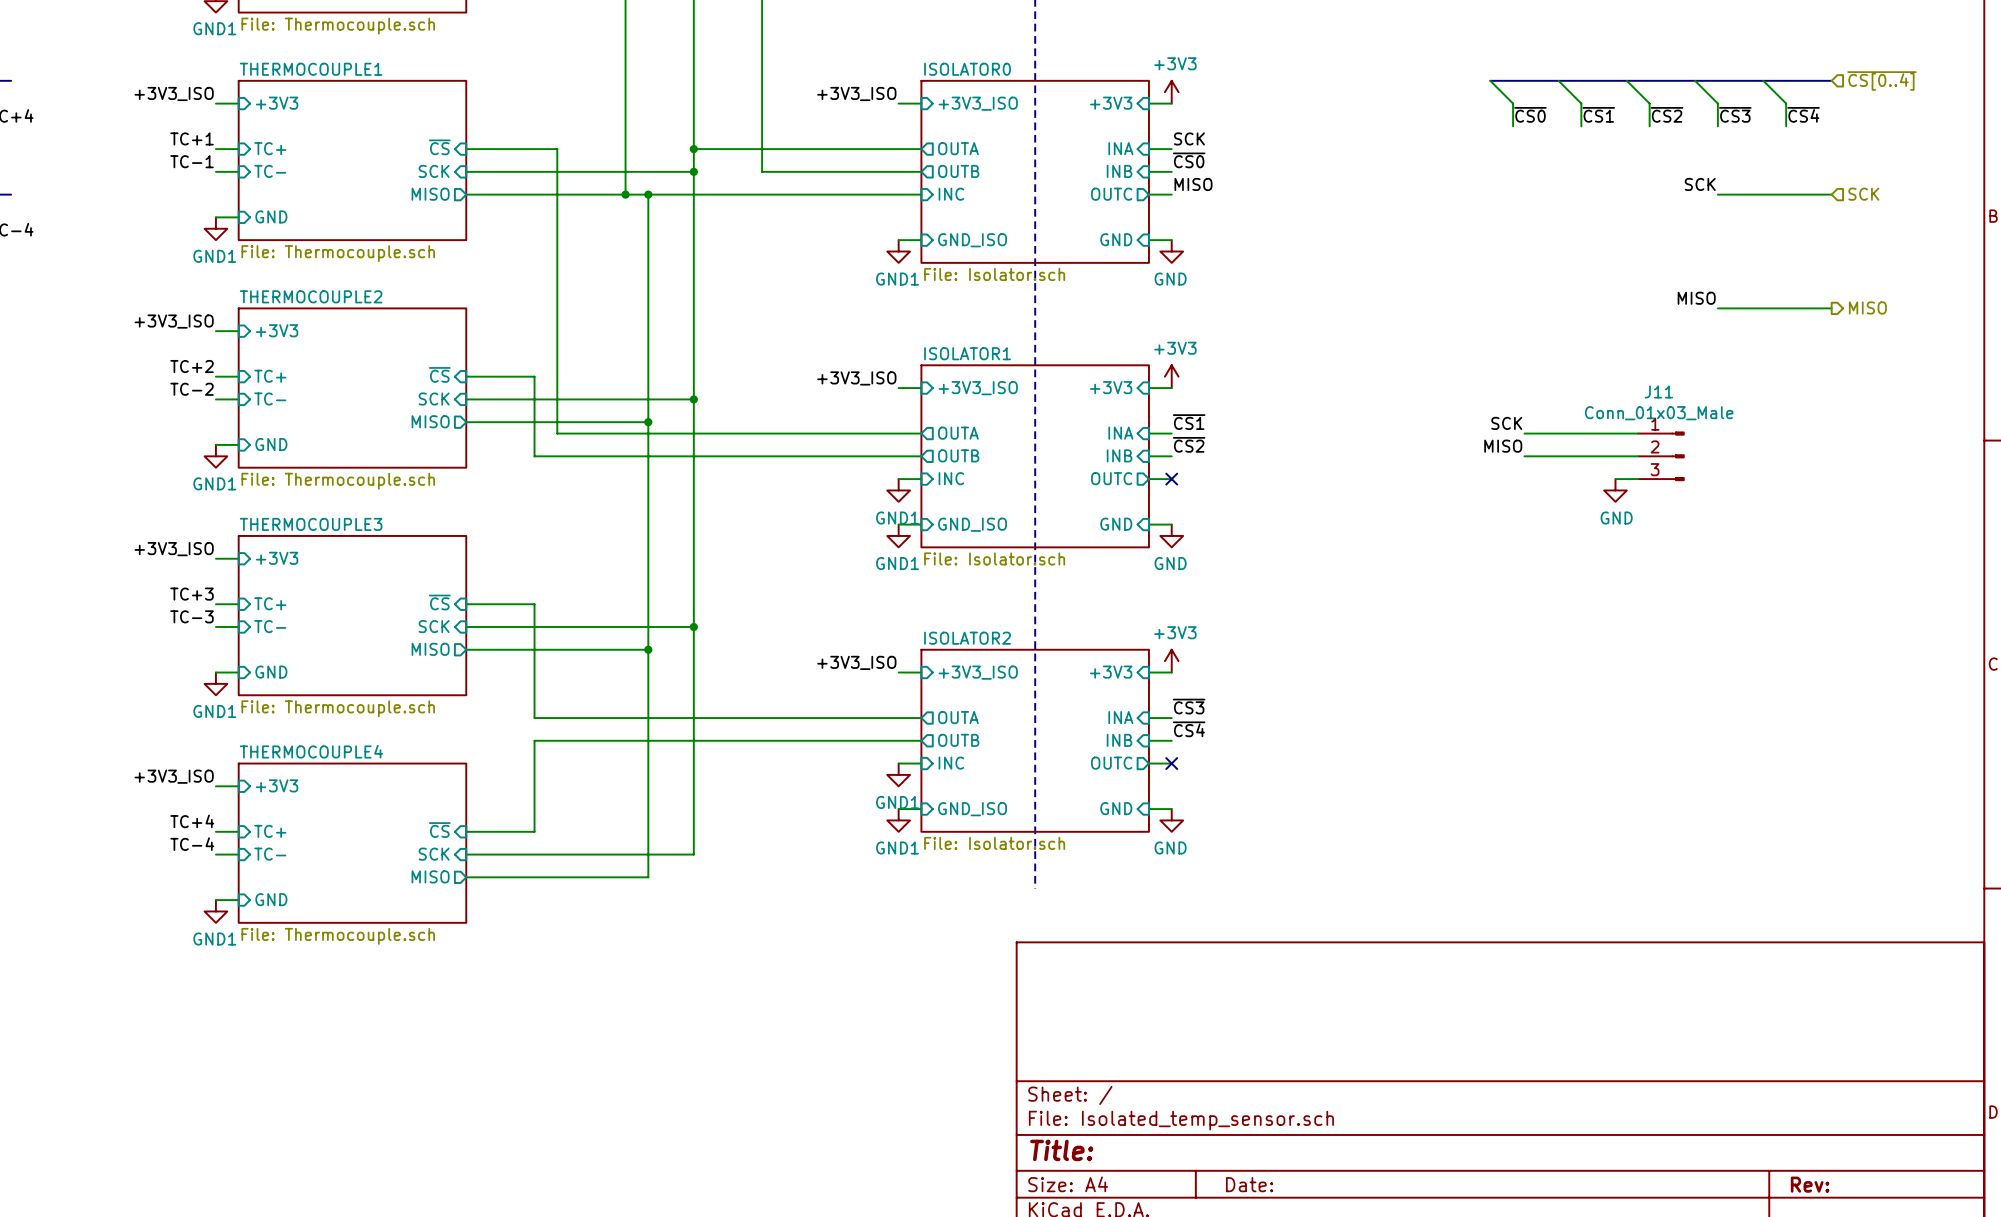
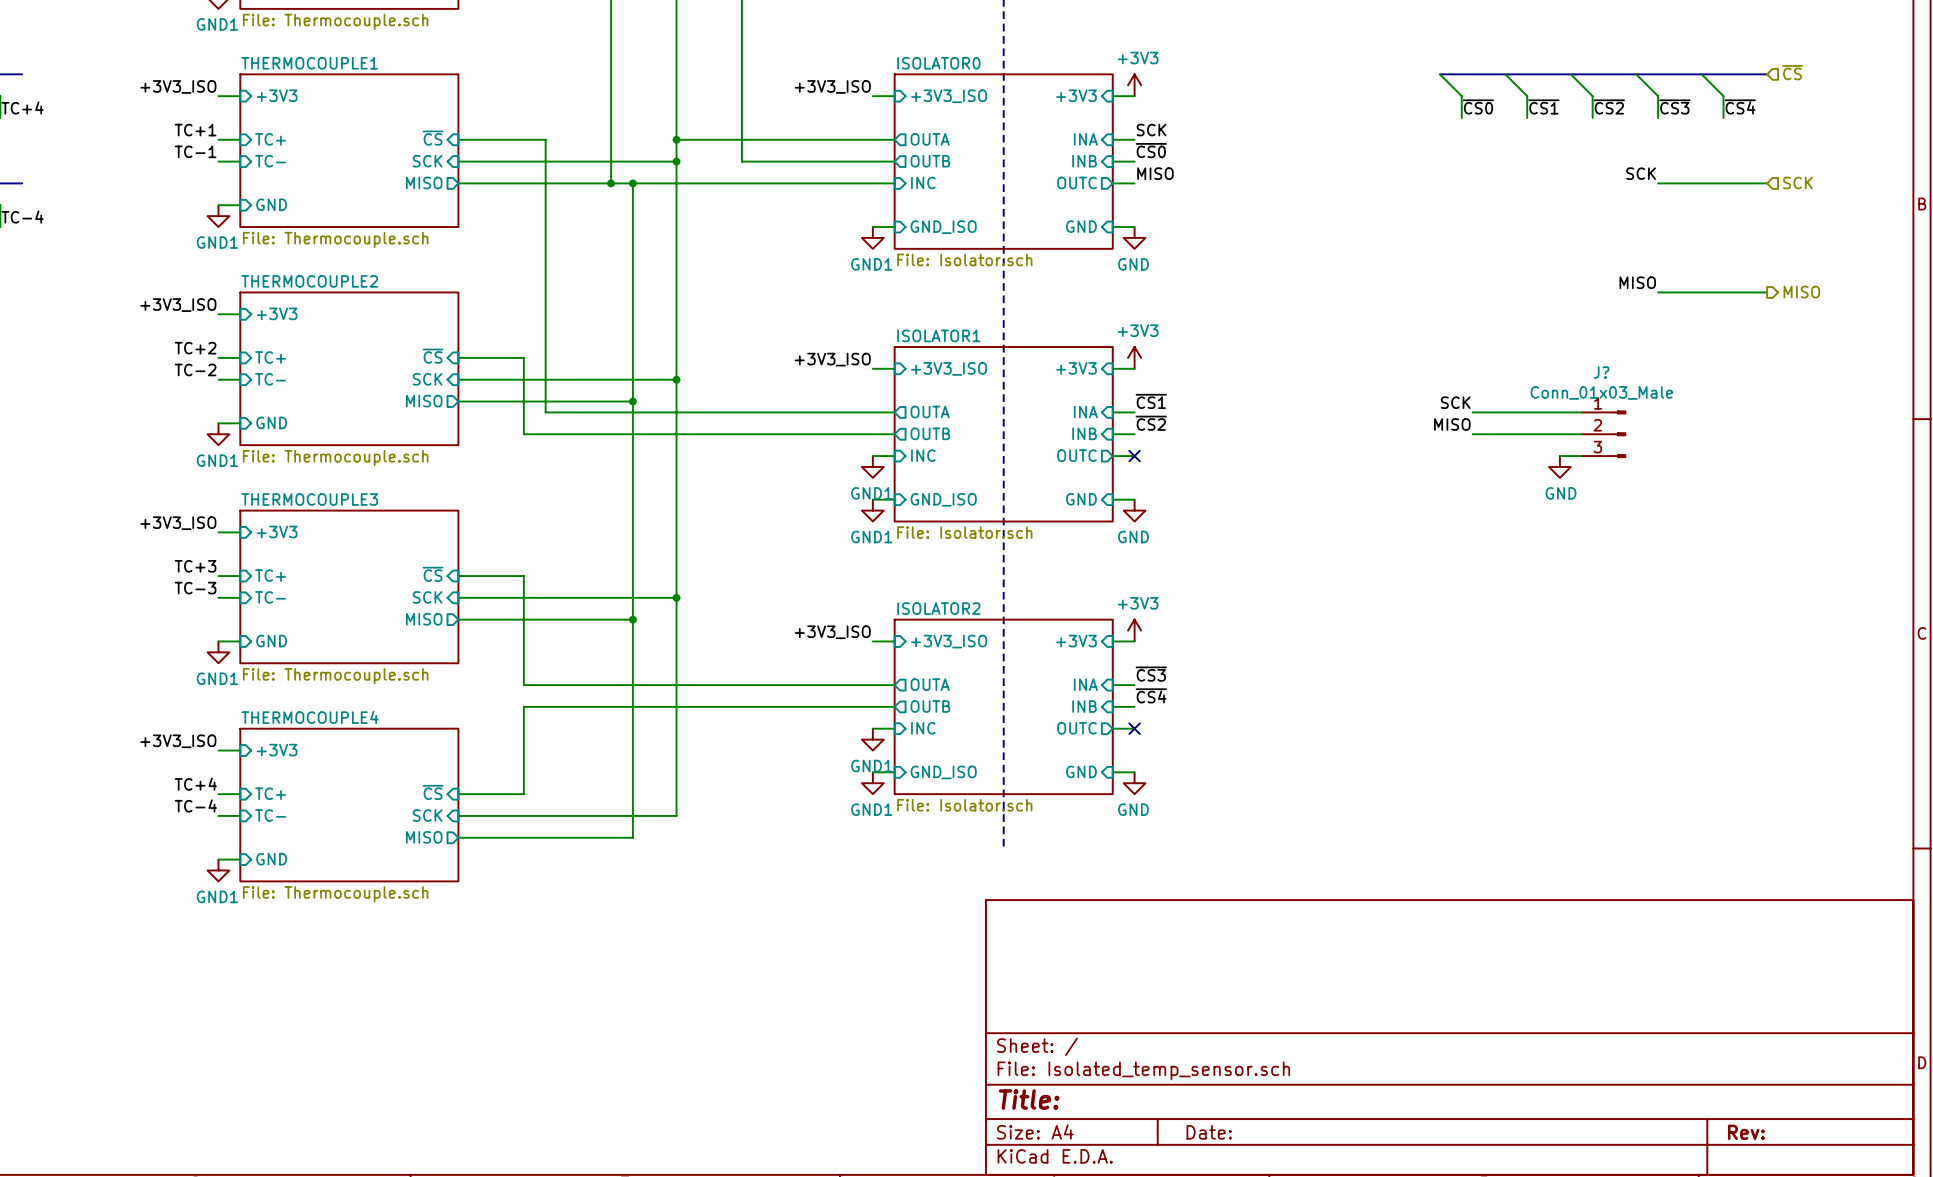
hierarchical label: ~{CS[0..4]} (1881, 80) -> ~{CS} (1792, 72)
J11 name: J11 (1658, 391) -> J? (1601, 372)

